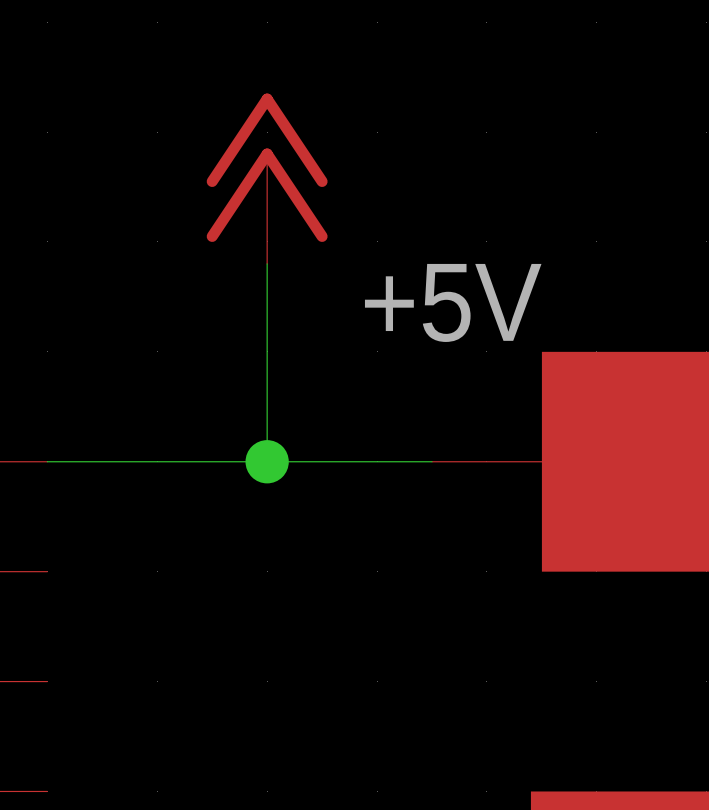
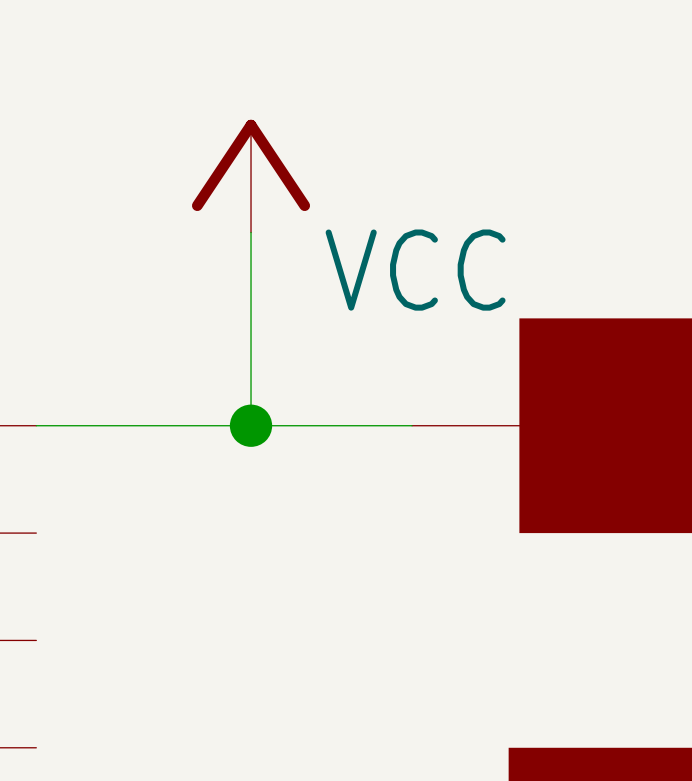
power symbol: +5V (267, 178) -> VCC (251, 176)

